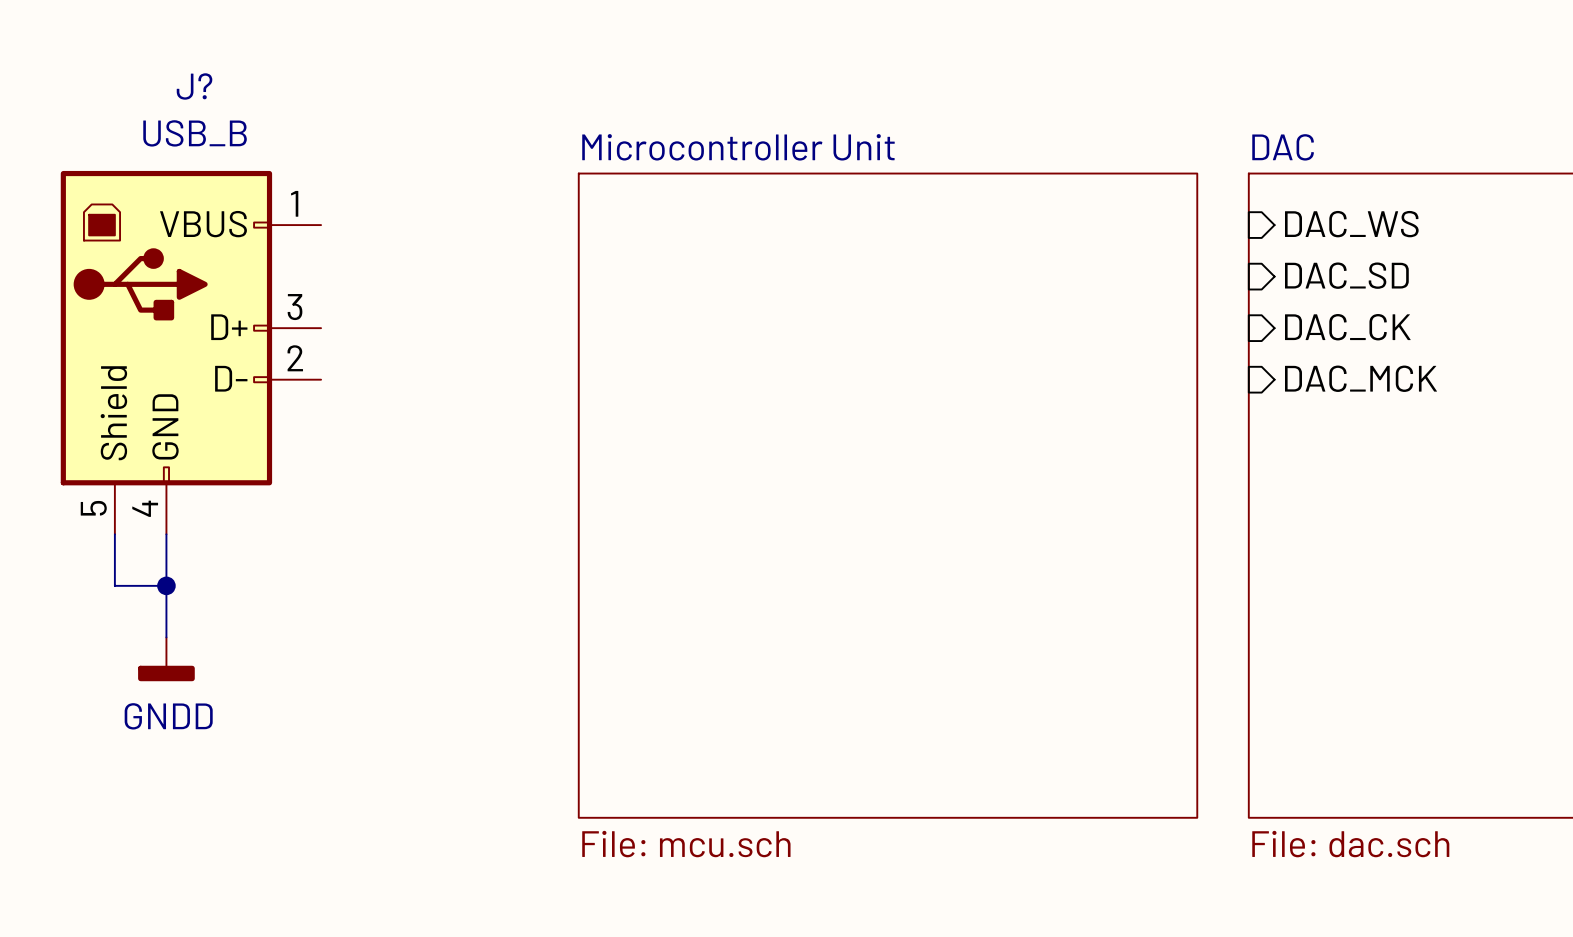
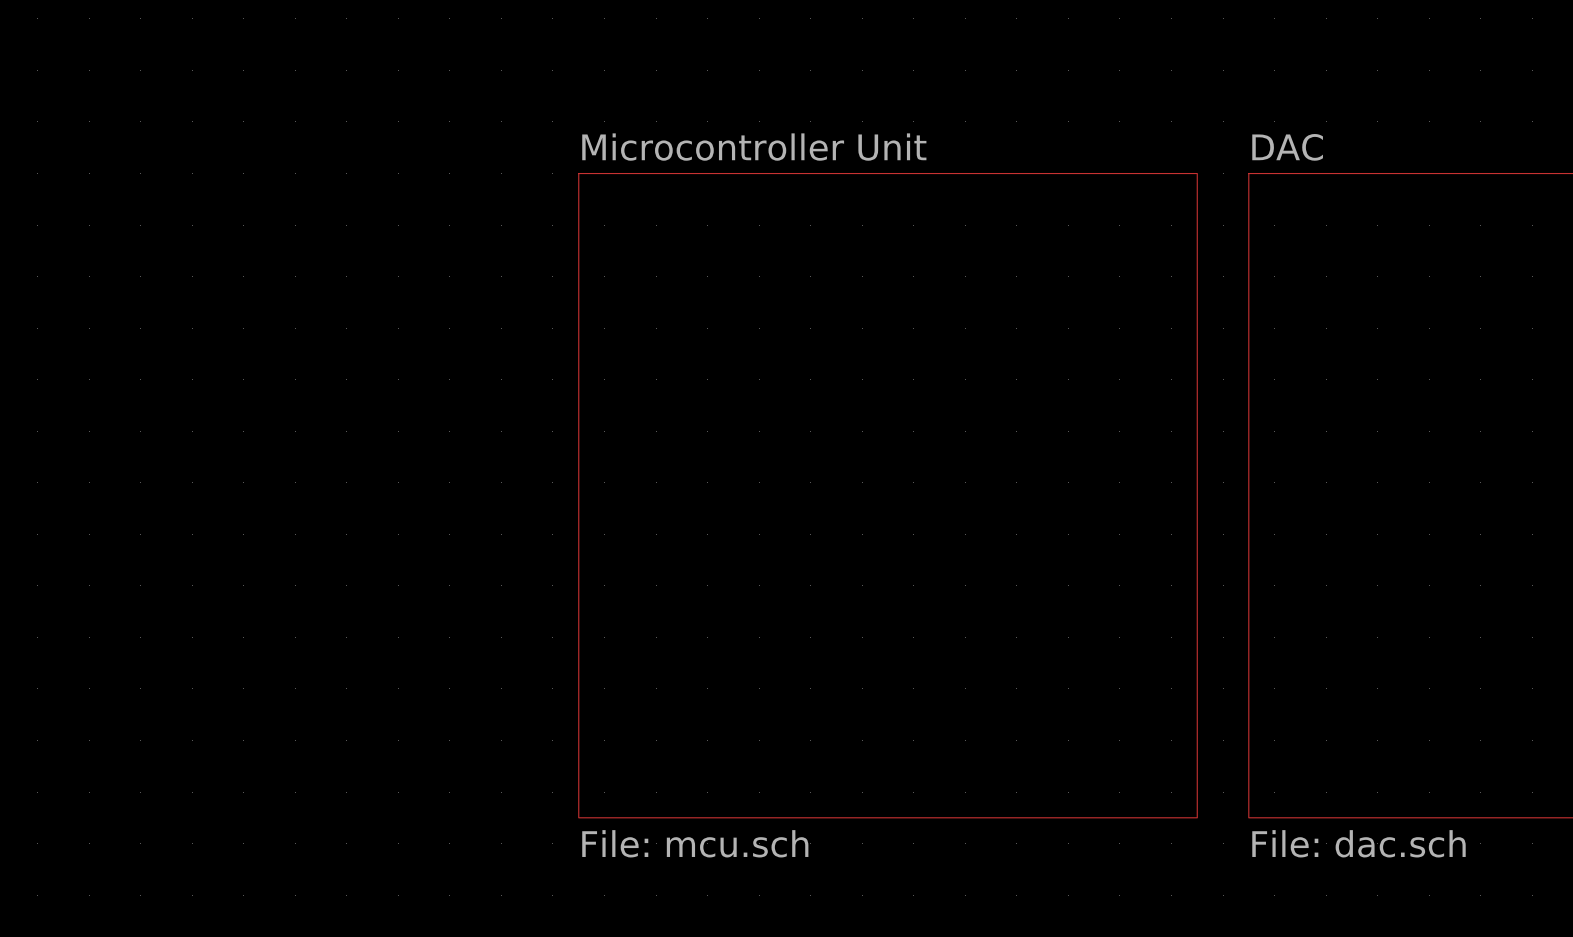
sheet pin: DAC_WS (1351, 224) -> none
sheet pin: DAC_SD (1346, 275) -> none
sheet pin: DAC_CK (1347, 327) -> none
J?: USB_B (190, 352) -> none
sheet pin: DAC_MCK (1360, 378) -> none
wire: (114, 534) (114, 585) (166, 585) -> none
wire: (166, 534) (166, 637) -> none
junction: (166, 585) -> none
power symbol: GNDD (166, 659) -> none

